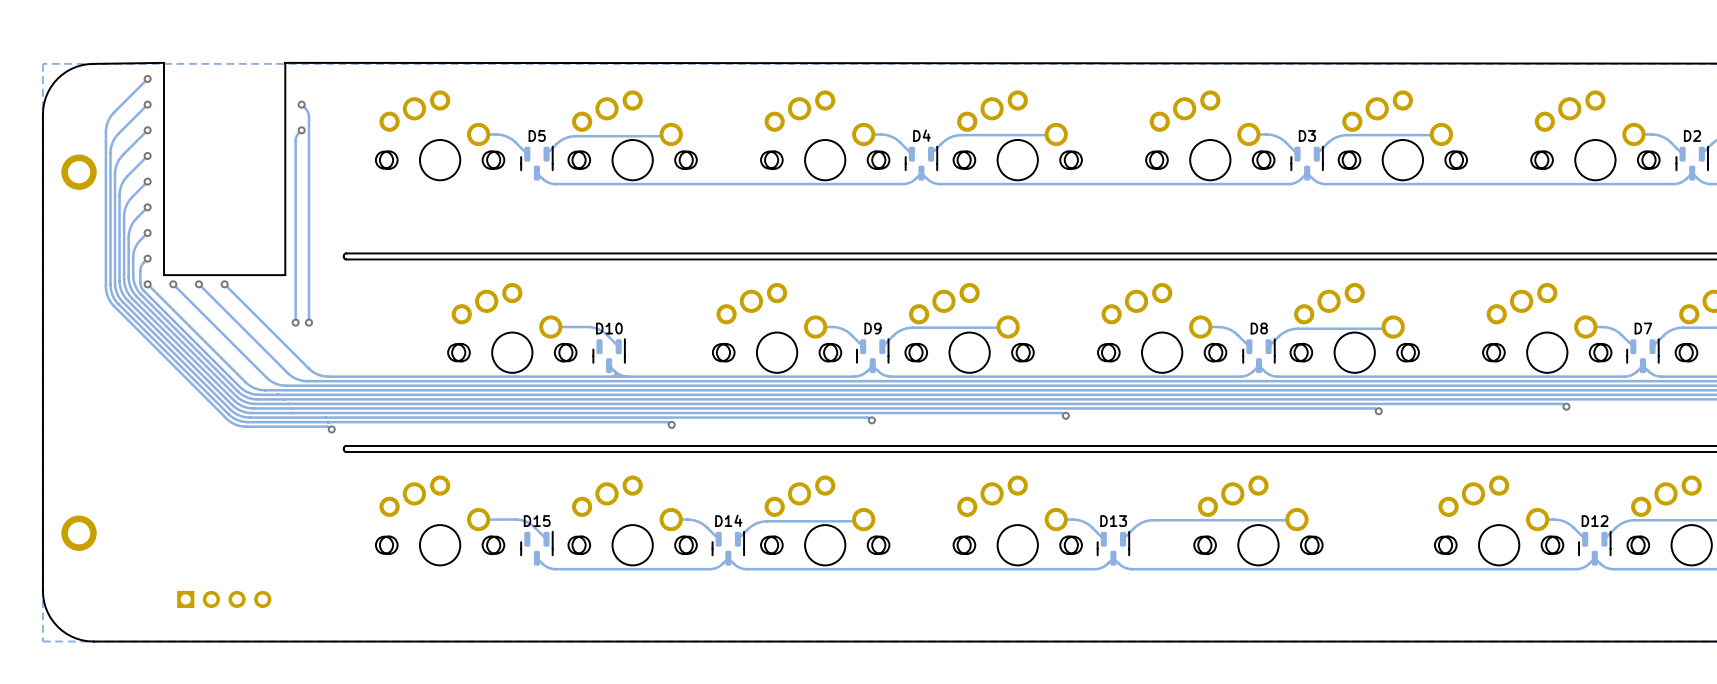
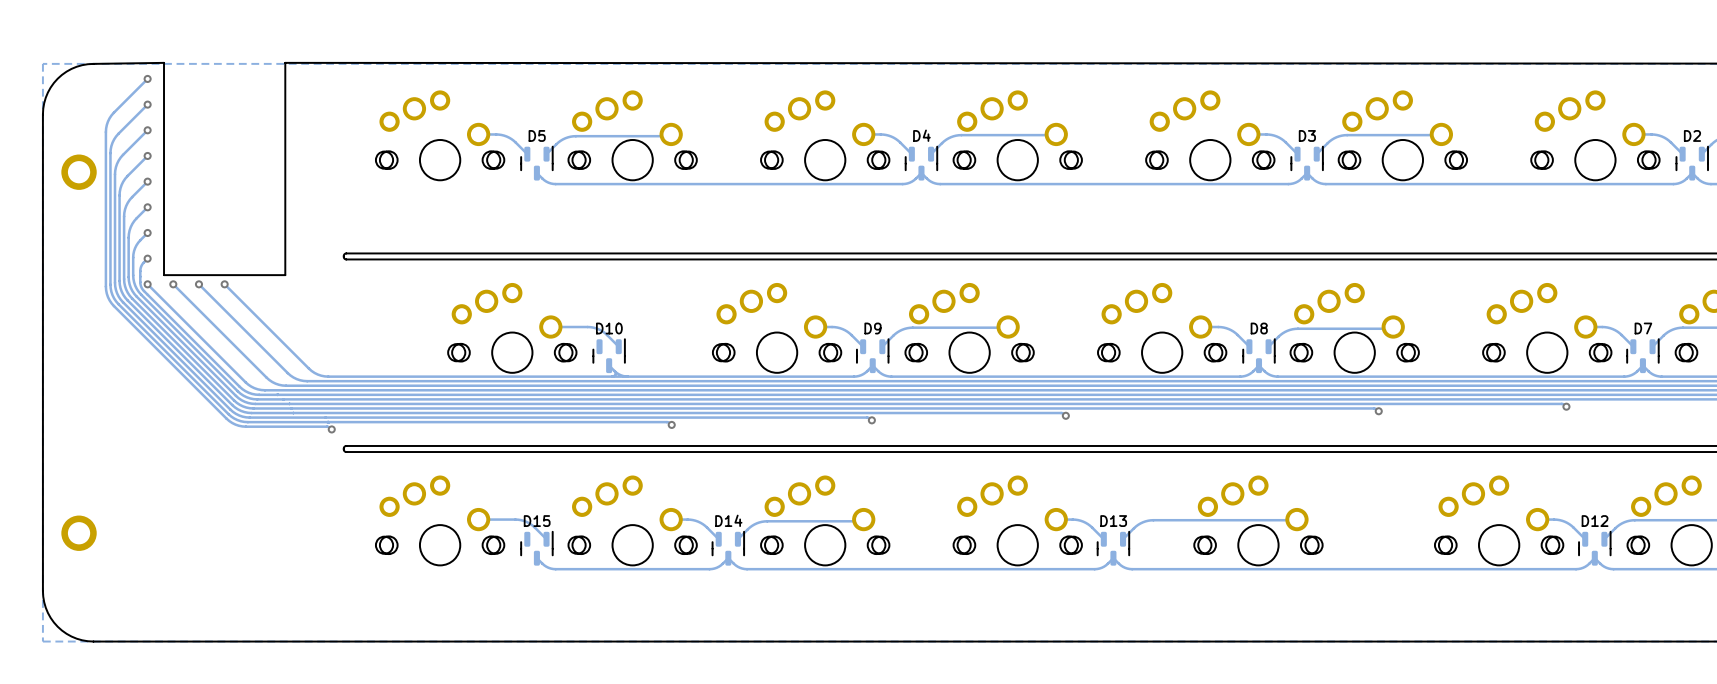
track: (301, 104) (307, 111) (309, 117) (309, 322) -> none
via: (301, 104) -> none
track: (301, 130) (295, 140) (295, 322) -> none
via: (301, 130) -> none
via: (295, 322) -> none
via: (309, 322) -> none
part: (224, 599) -> none

